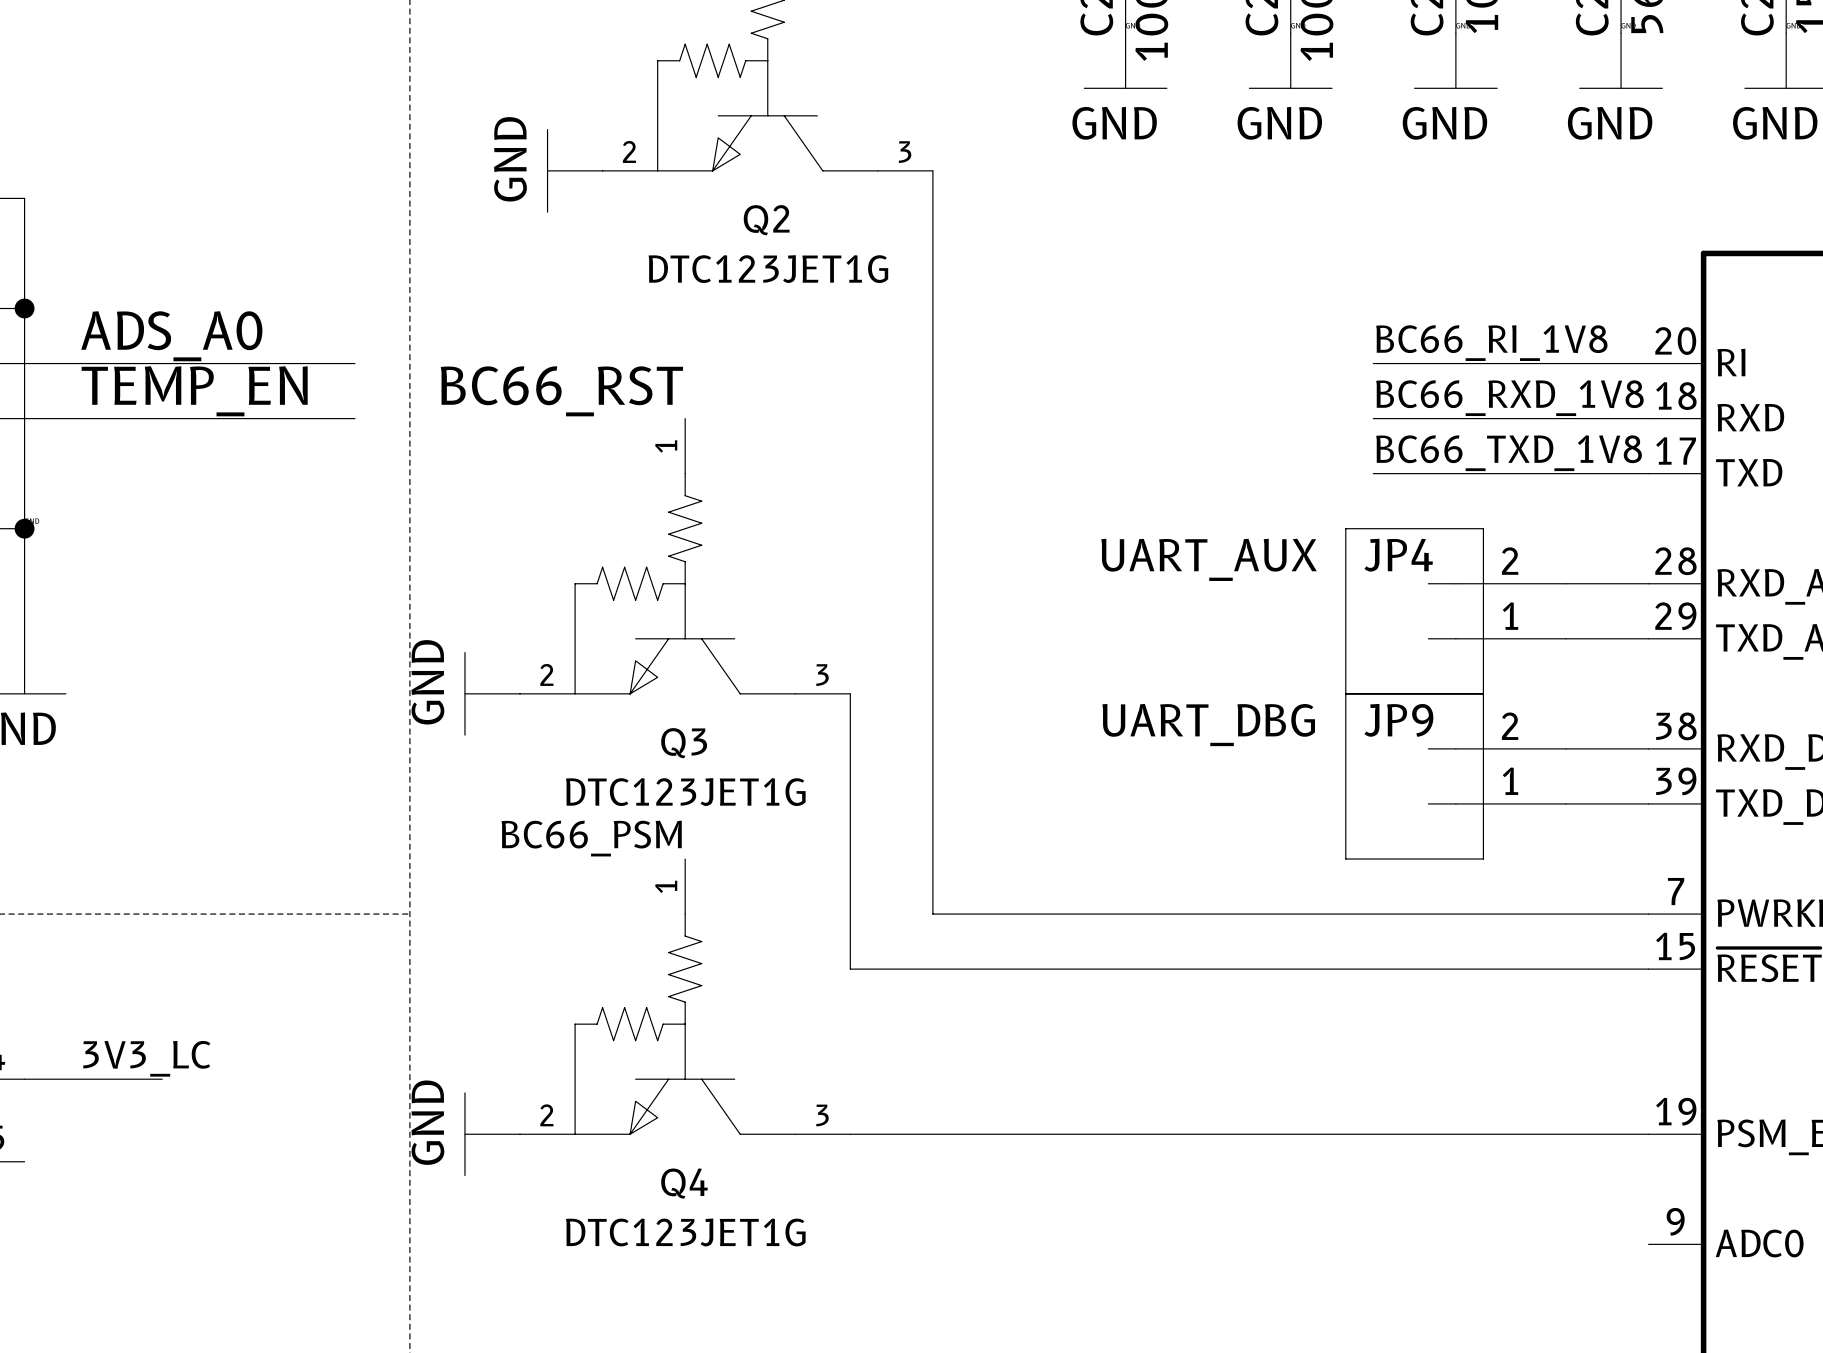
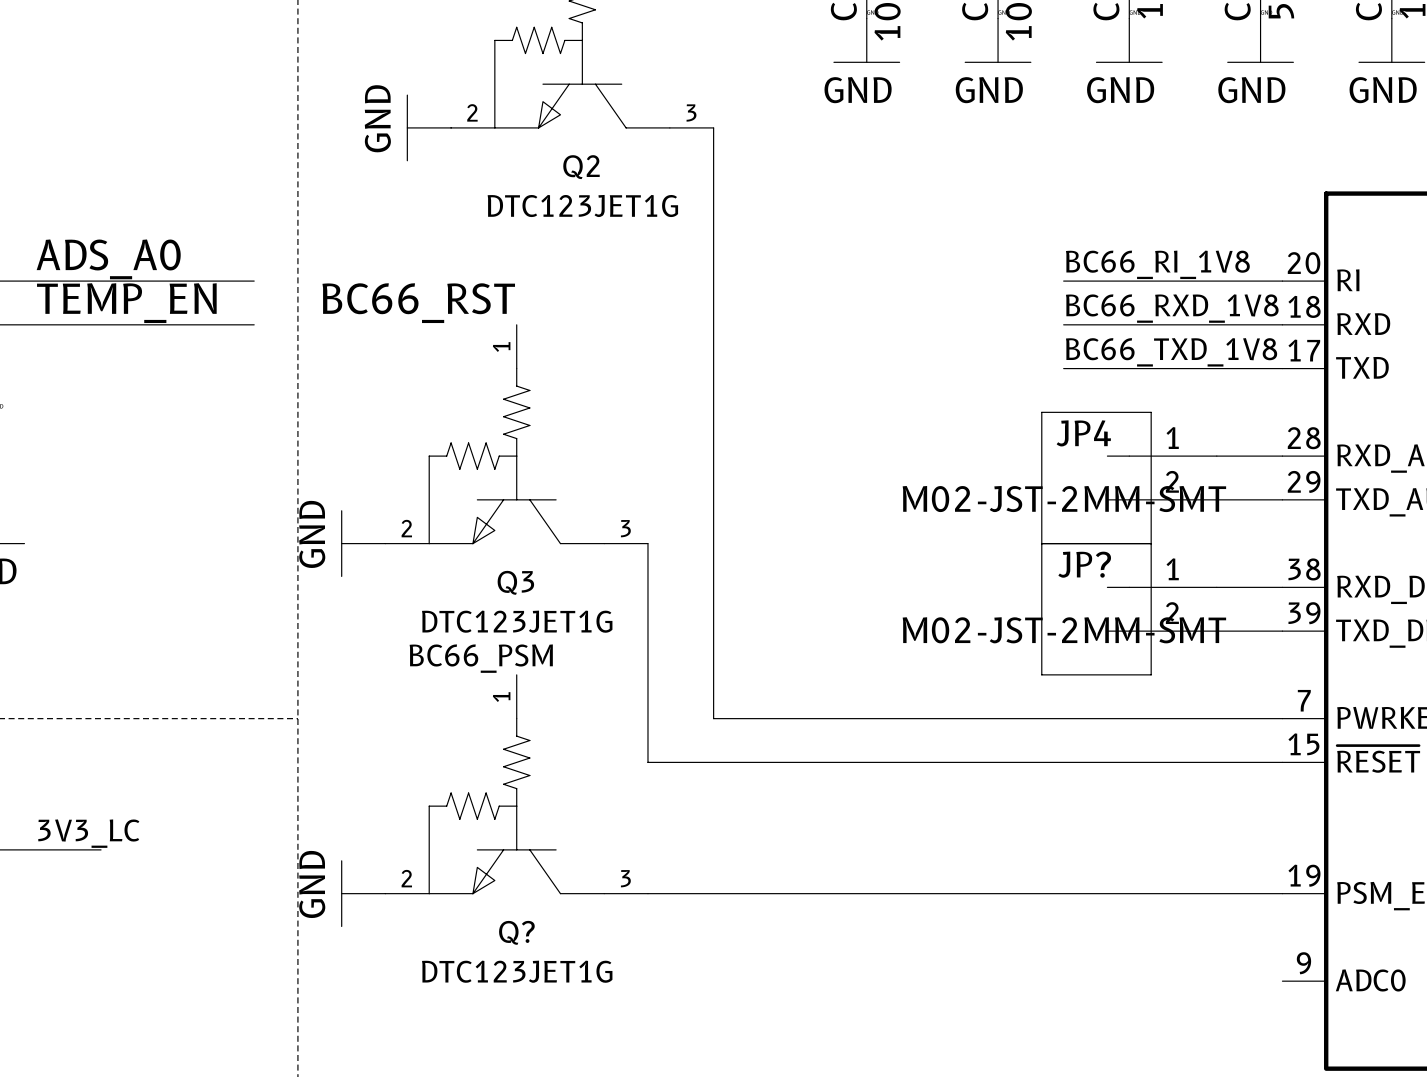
JP4 value: UART_AUX (1209, 559) -> M02-JST-2MM-SMT (1064, 499)
JP4 flip: as is (1414, 611) -> up-down (1096, 477)
JP9 name: JP9 (1398, 720) -> JP? (1084, 564)
JP9 value: UART_DBG (1208, 725) -> M02-JST-2MM-SMT (1064, 630)
JP9 flip: as is (1414, 776) -> up-down (1096, 609)
label position: BC66_PSM (591, 838) -> BC66_PSM (481, 658)
Q4 name: Q4 (684, 1183) -> Q? (516, 932)

